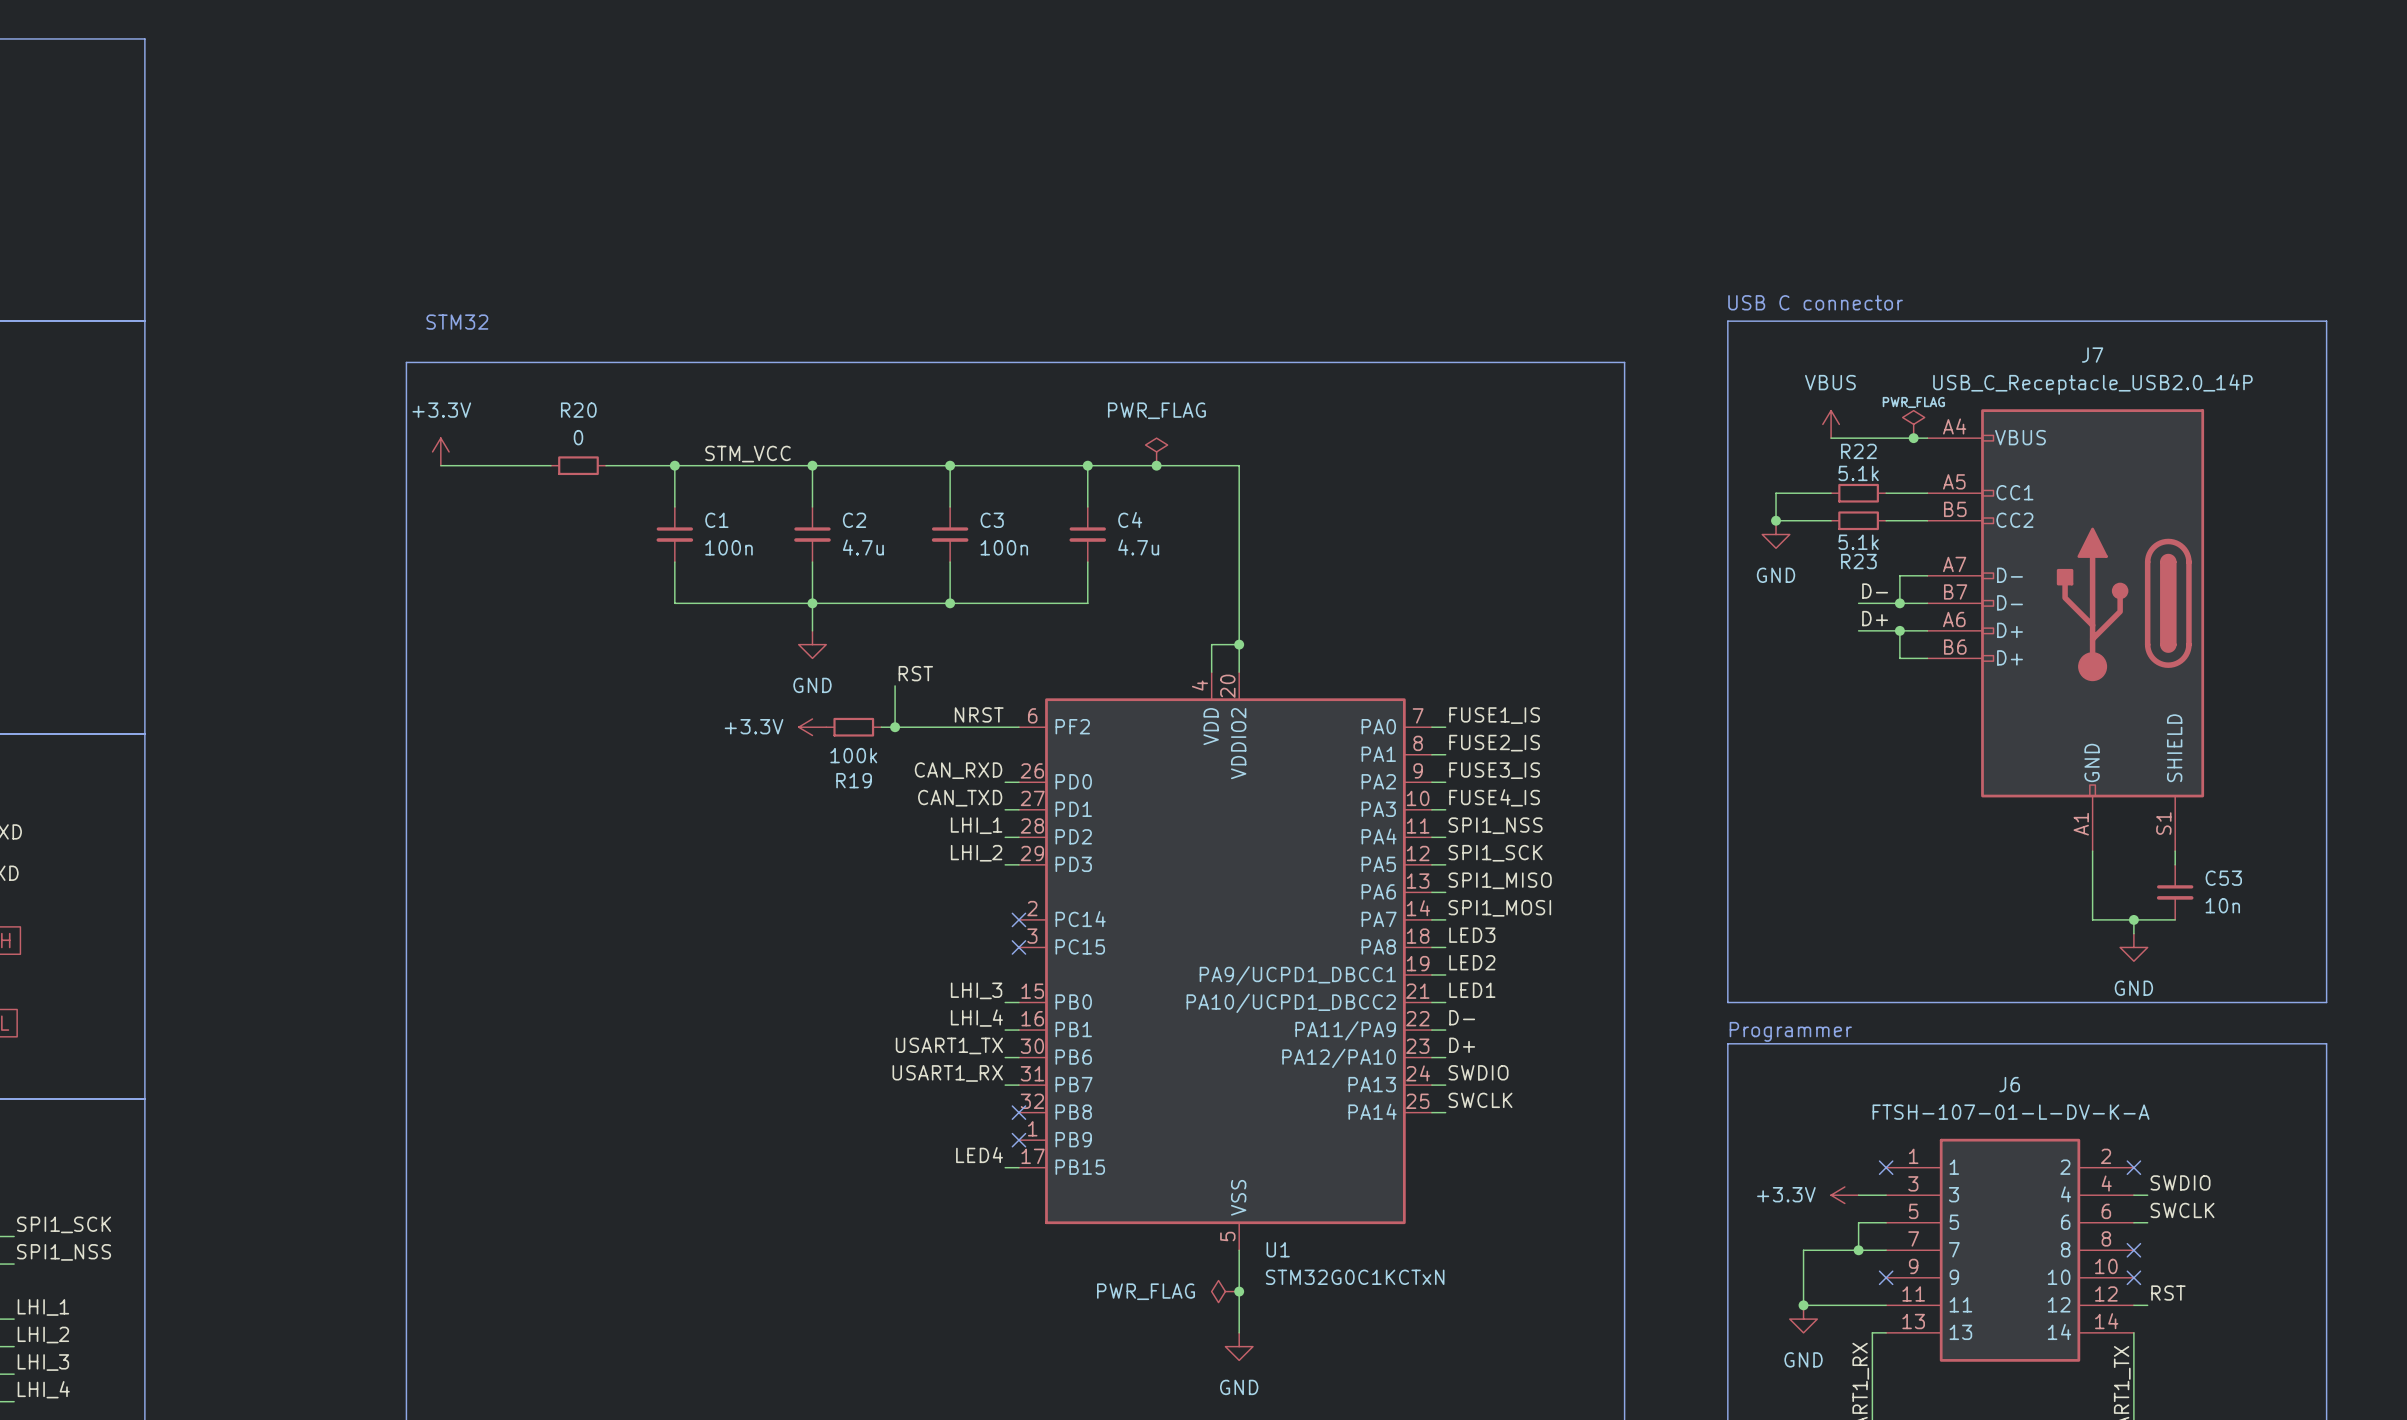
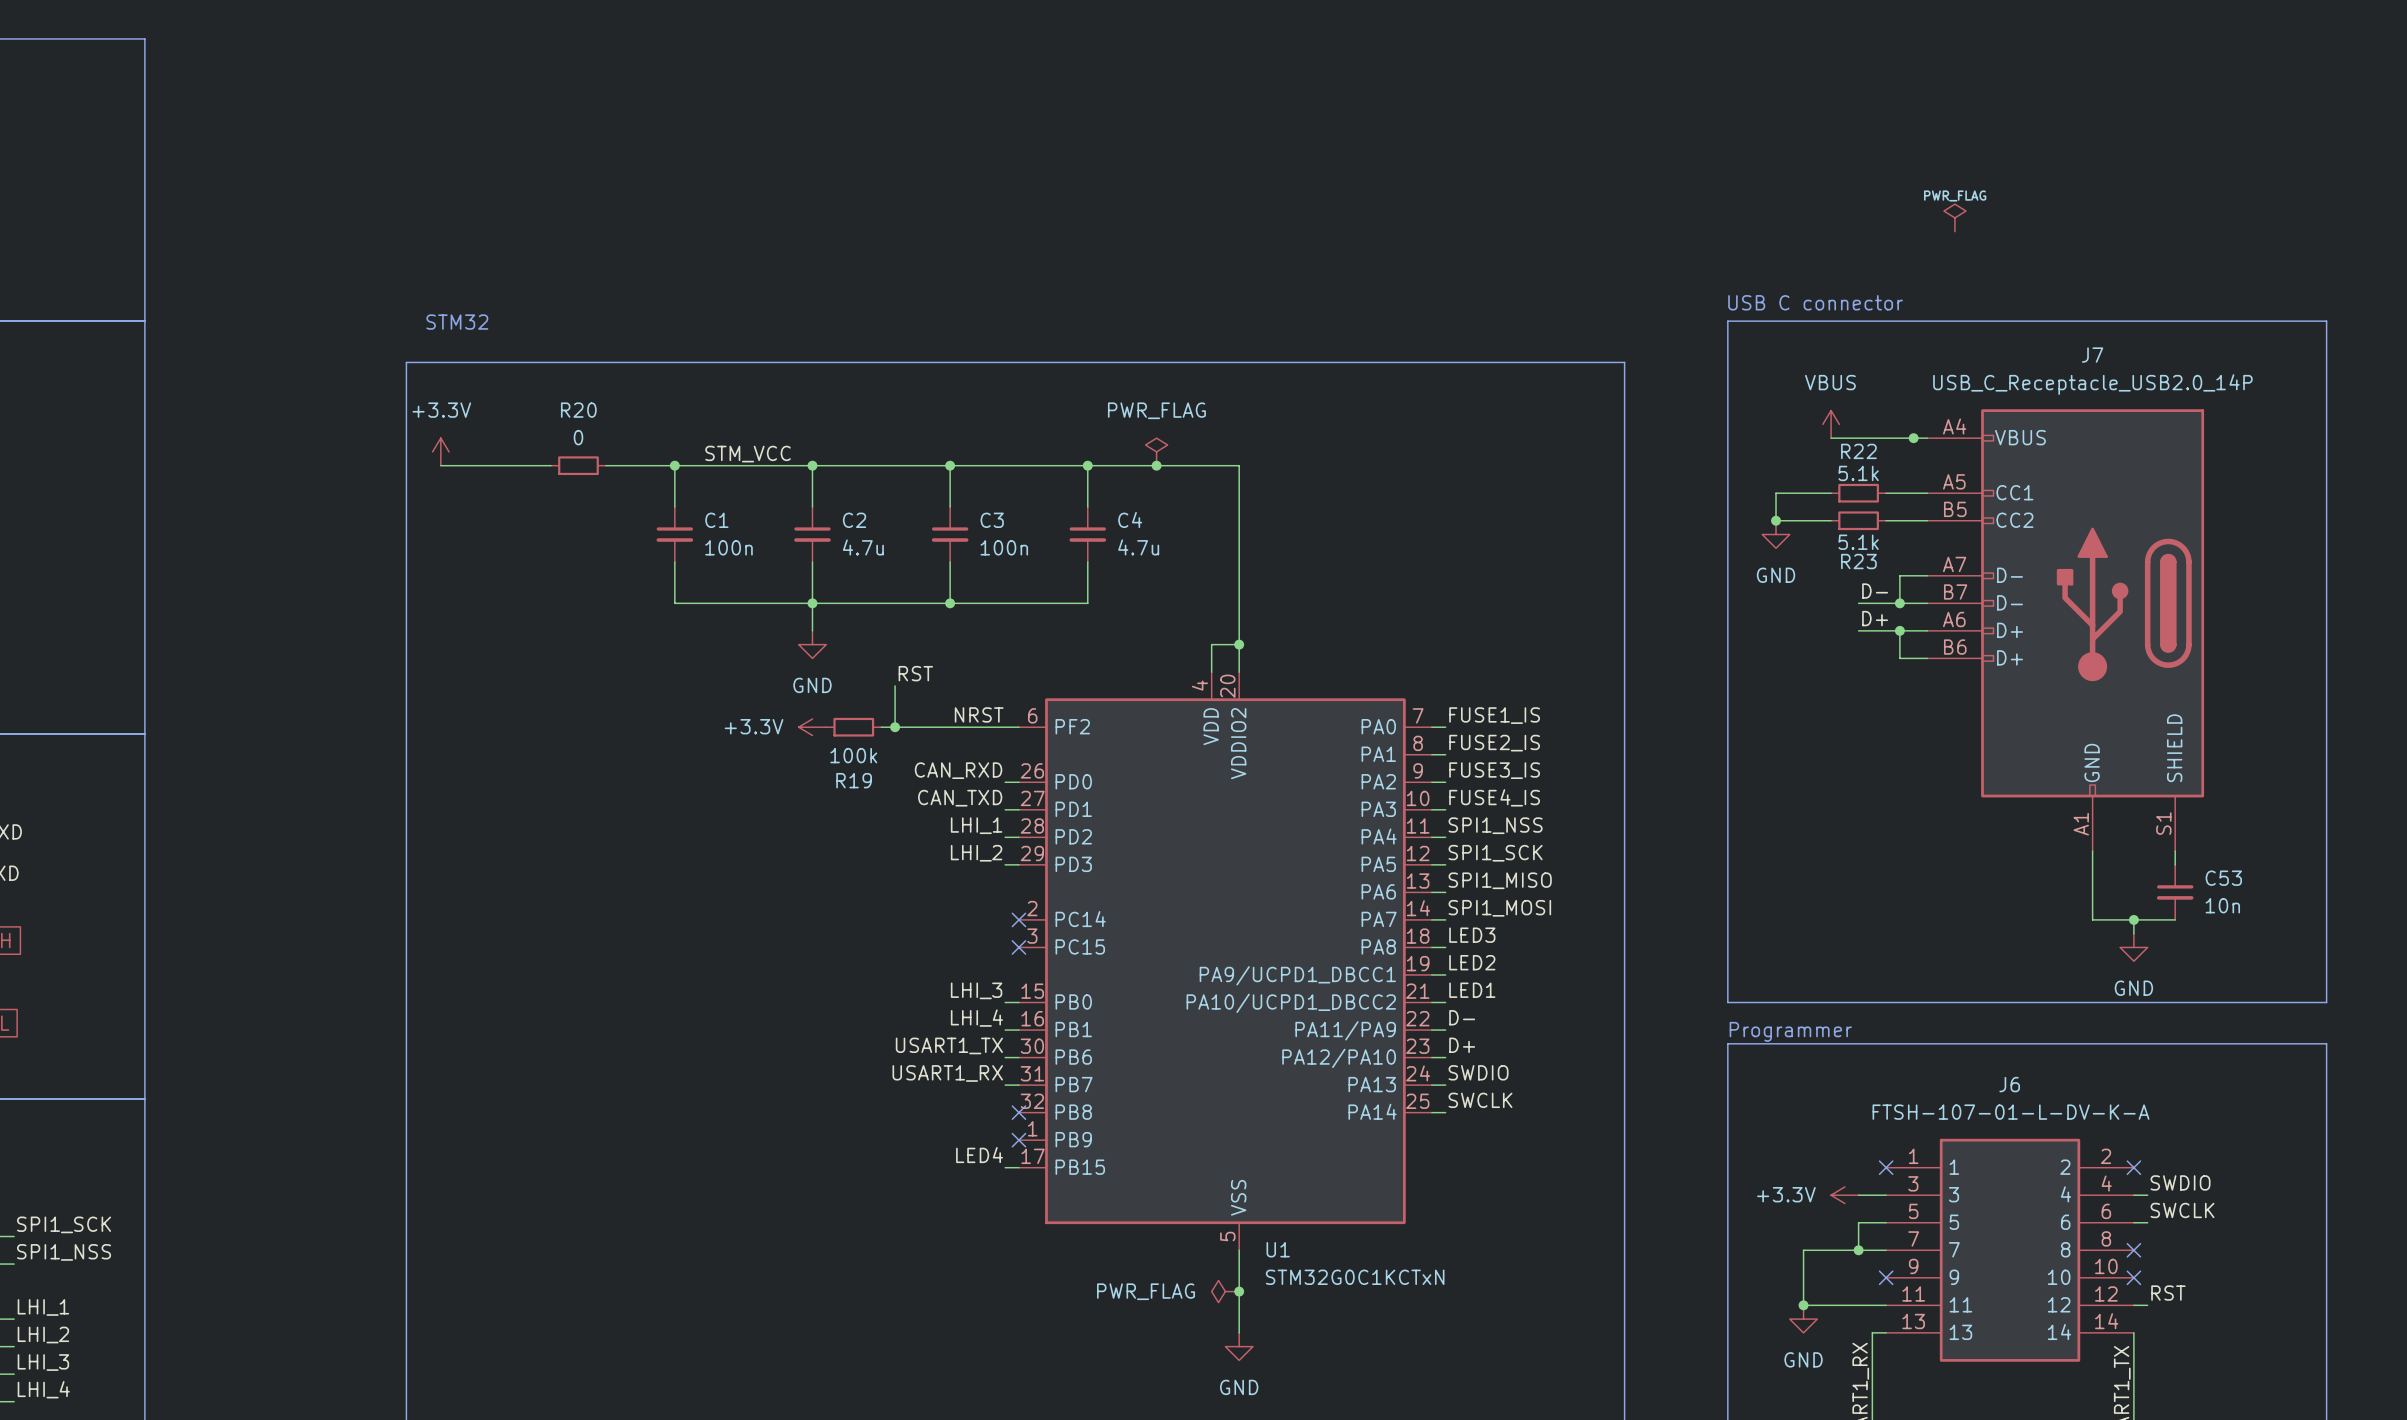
power symbol position: PWR_FLAG (1913, 424) -> PWR_FLAG (1954, 217)

